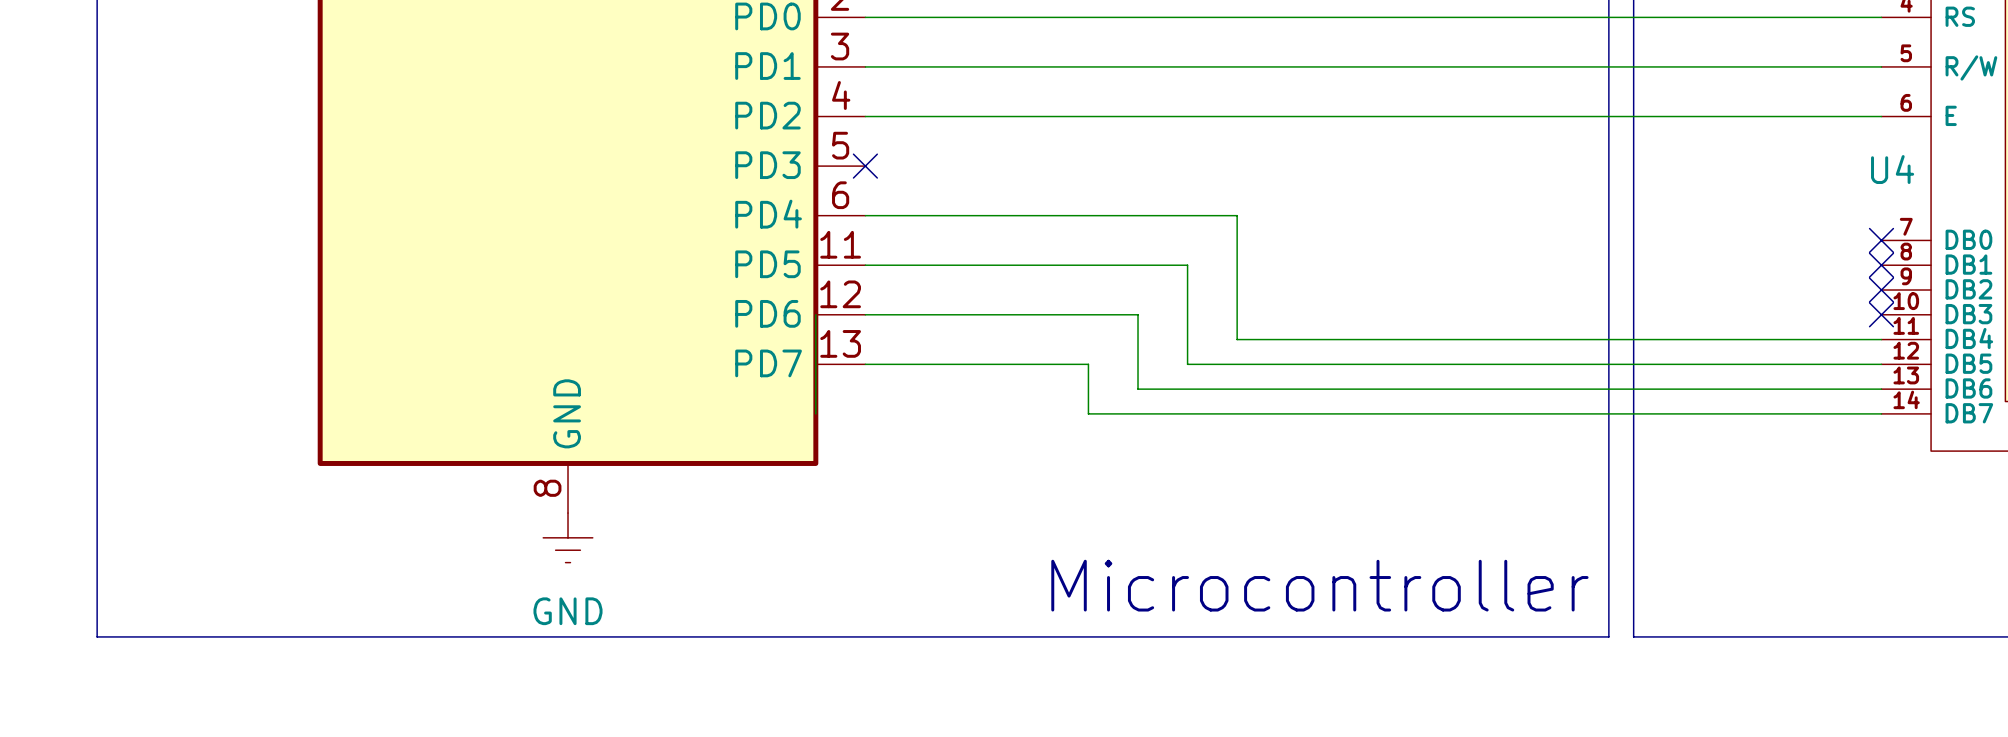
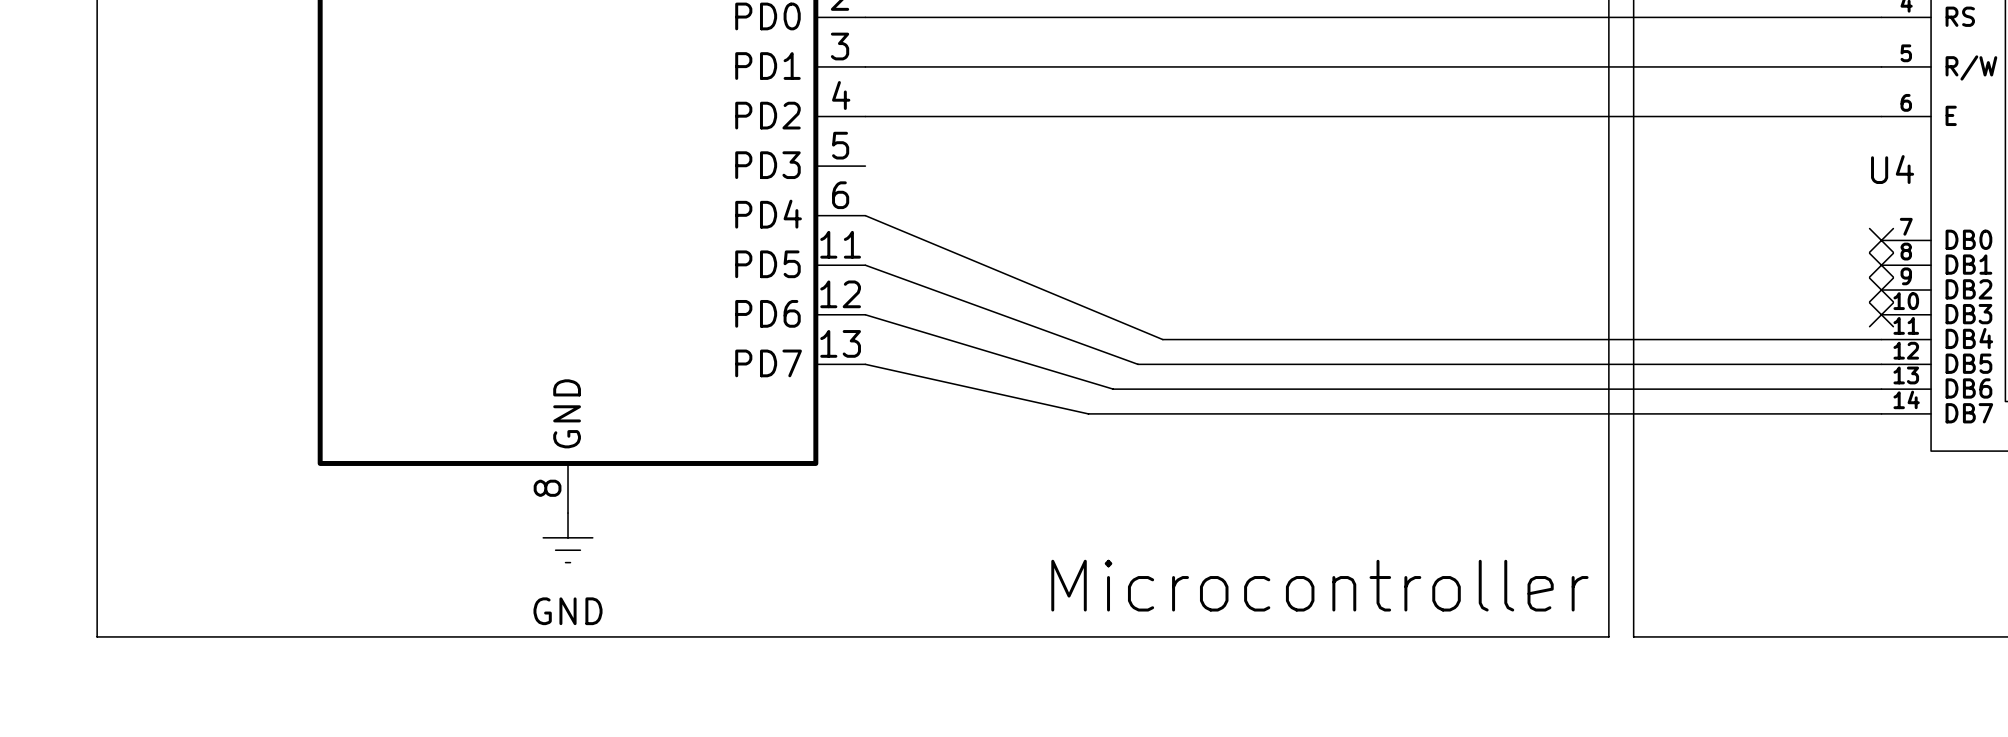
no-connect mark: (865, 166) -> none
wire: (865, 215) (1237, 215) (1237, 339) -> (865, 215) (1162, 339) (1237, 339)
wire: (865, 265) (1187, 265) (1187, 364) -> (865, 265) (1138, 364) (1187, 364)
wire: (865, 314) (1138, 314) (1138, 389) -> (865, 314) (1113, 389) (1138, 389)
wire: (865, 364) (1088, 364) (1088, 413) -> (865, 364) (1088, 413)

